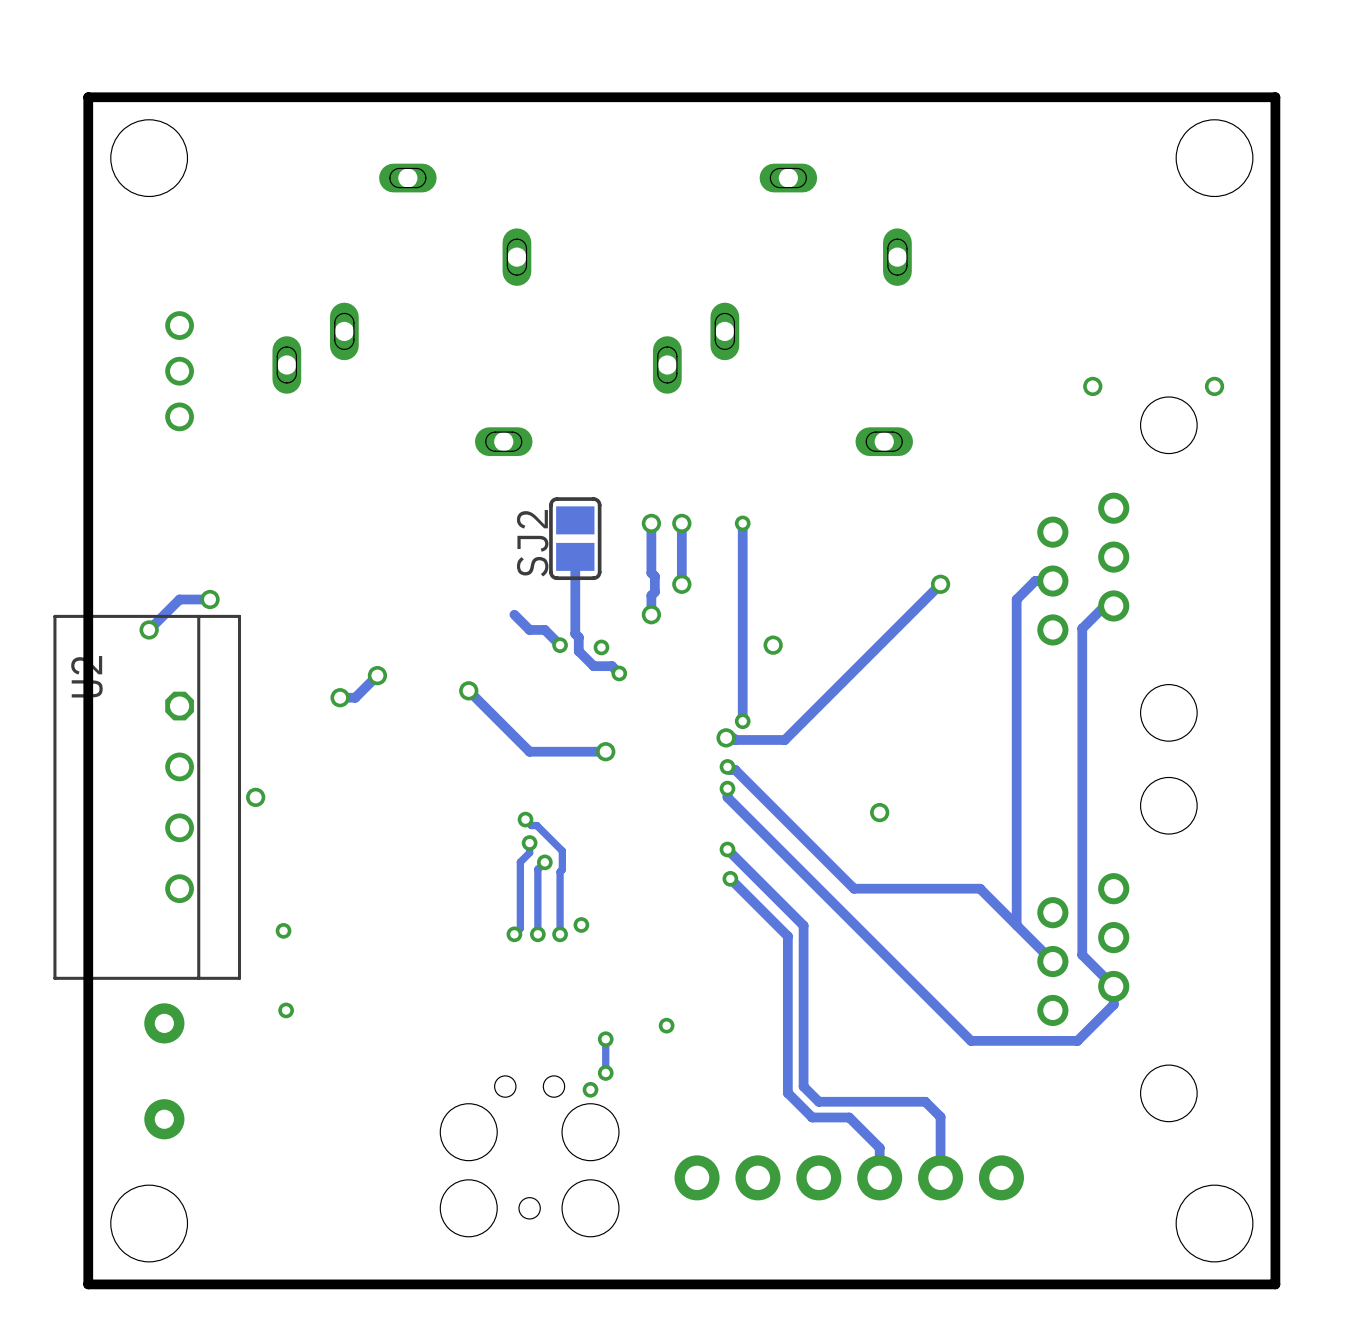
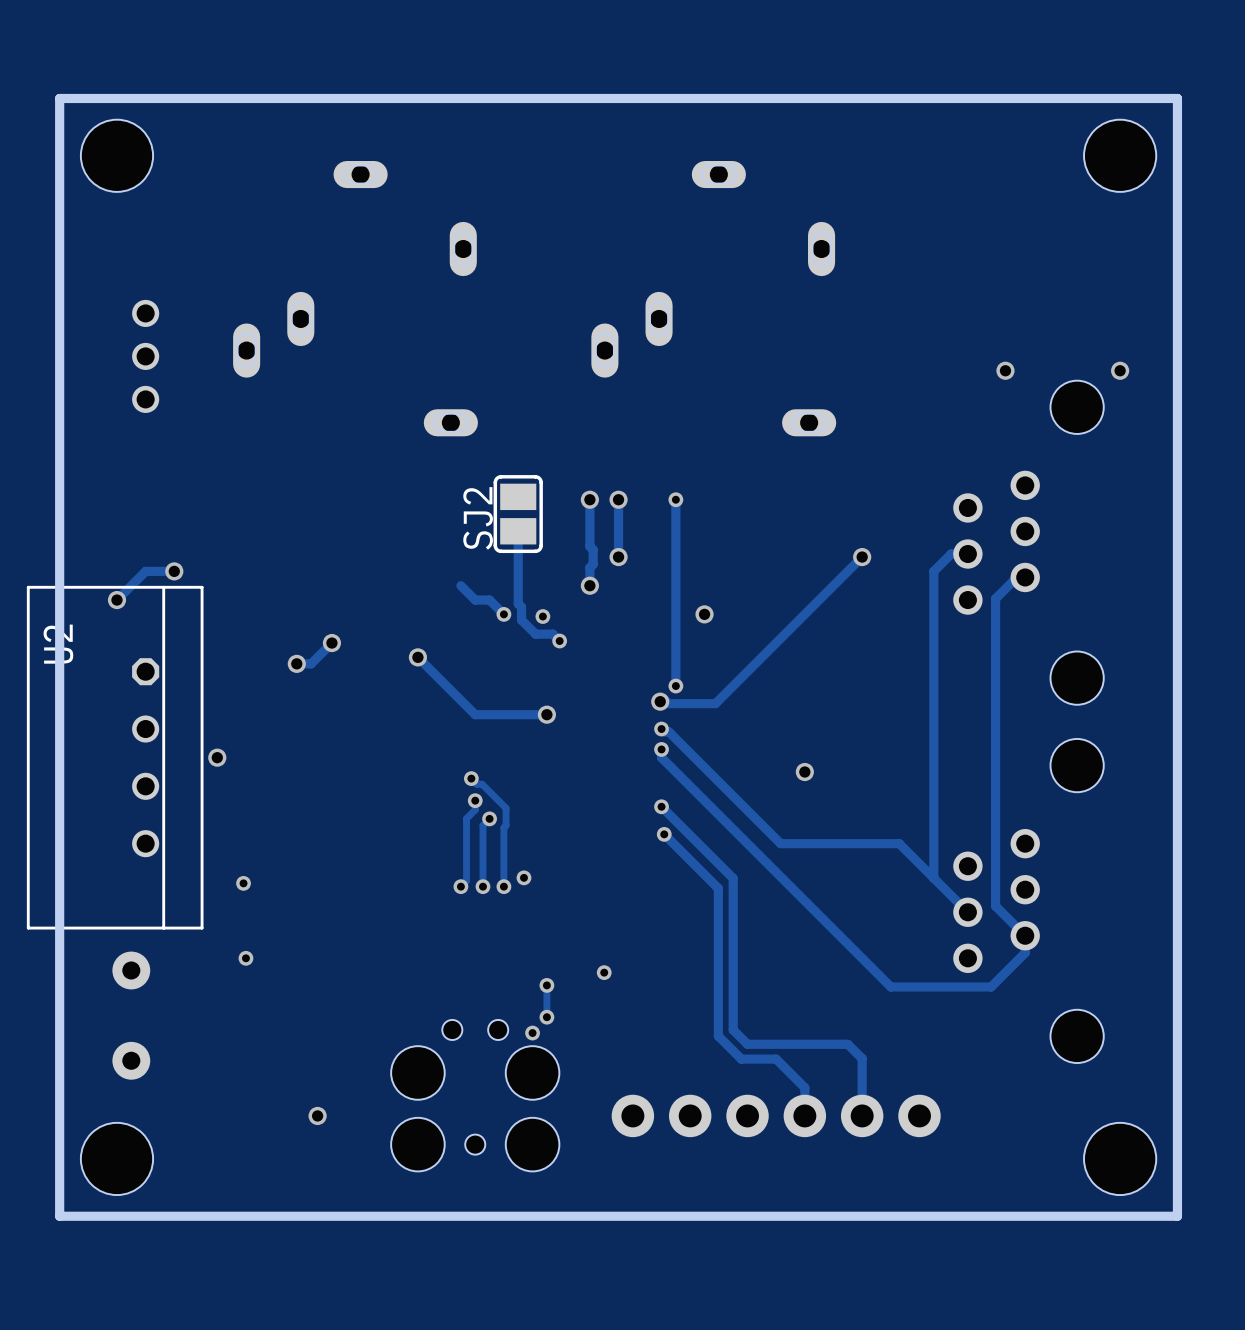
via: none -> (317, 1115)

